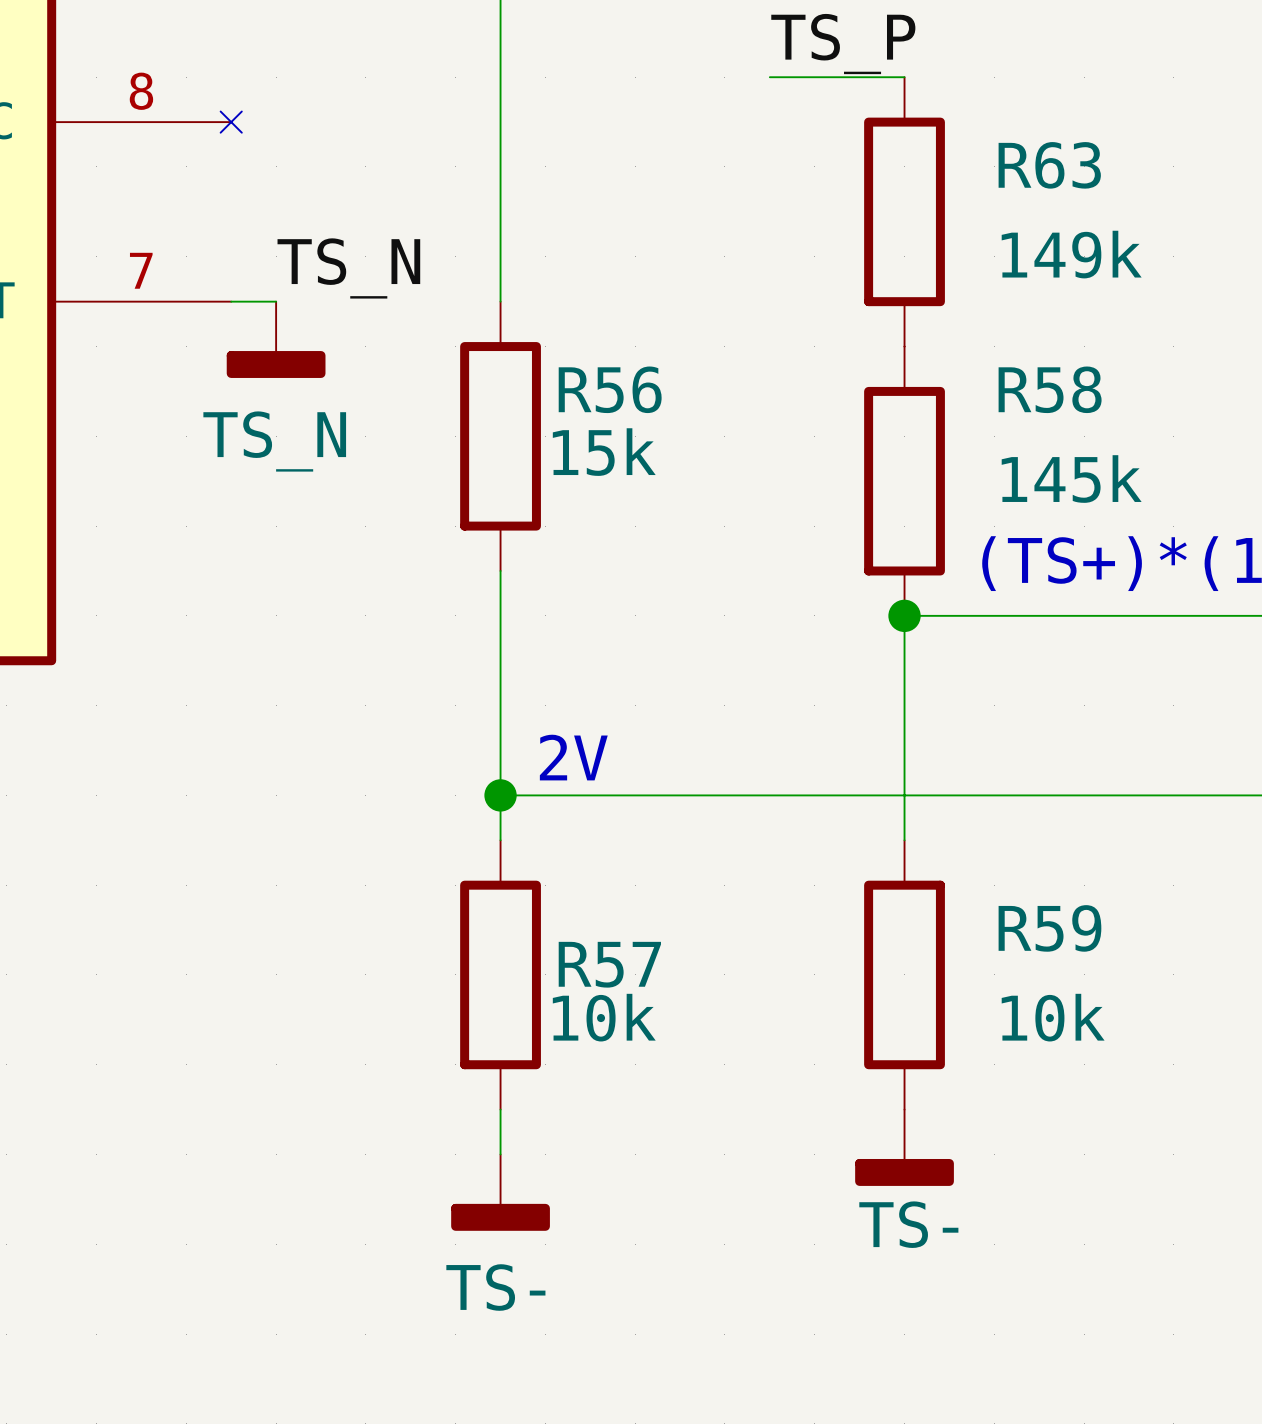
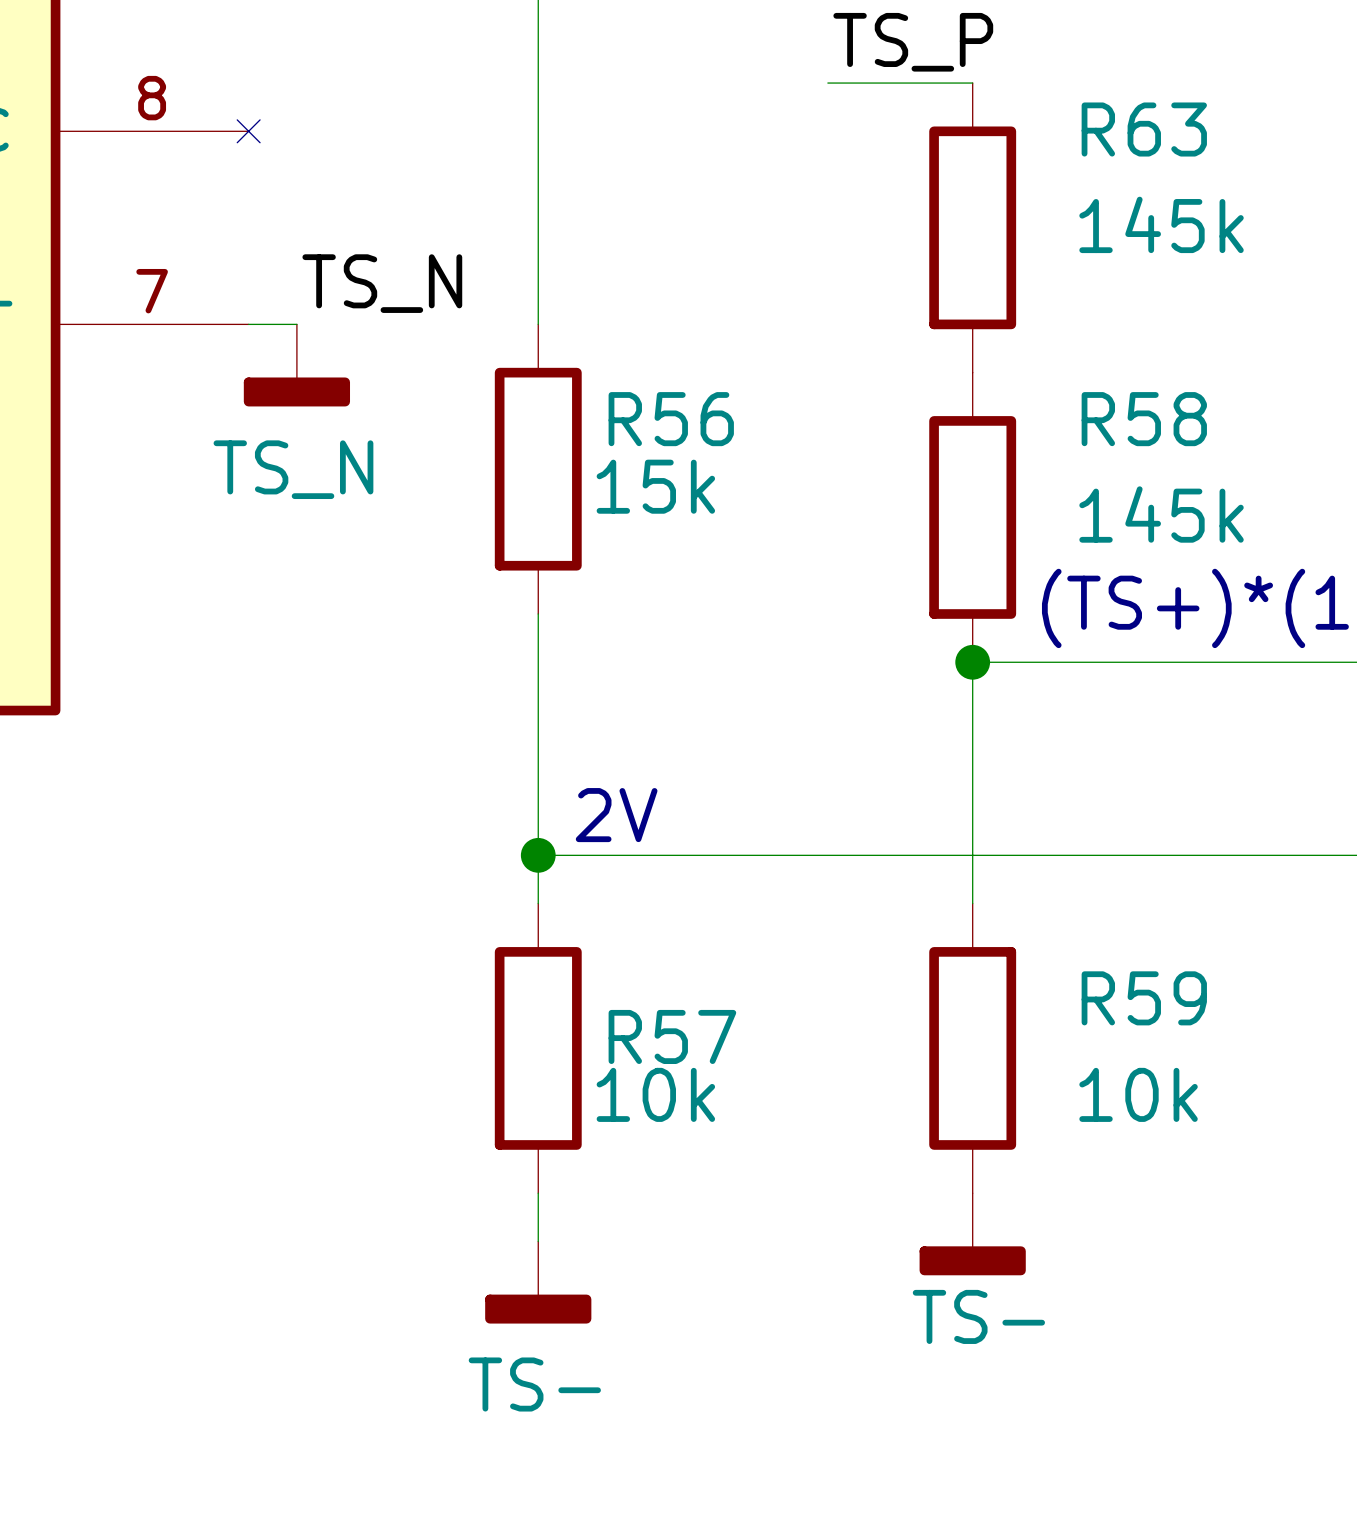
R63 name position: R63 (1049, 165) -> R63 (1144, 129)
R63 value: 149k (1071, 254) -> 145k (1161, 224)

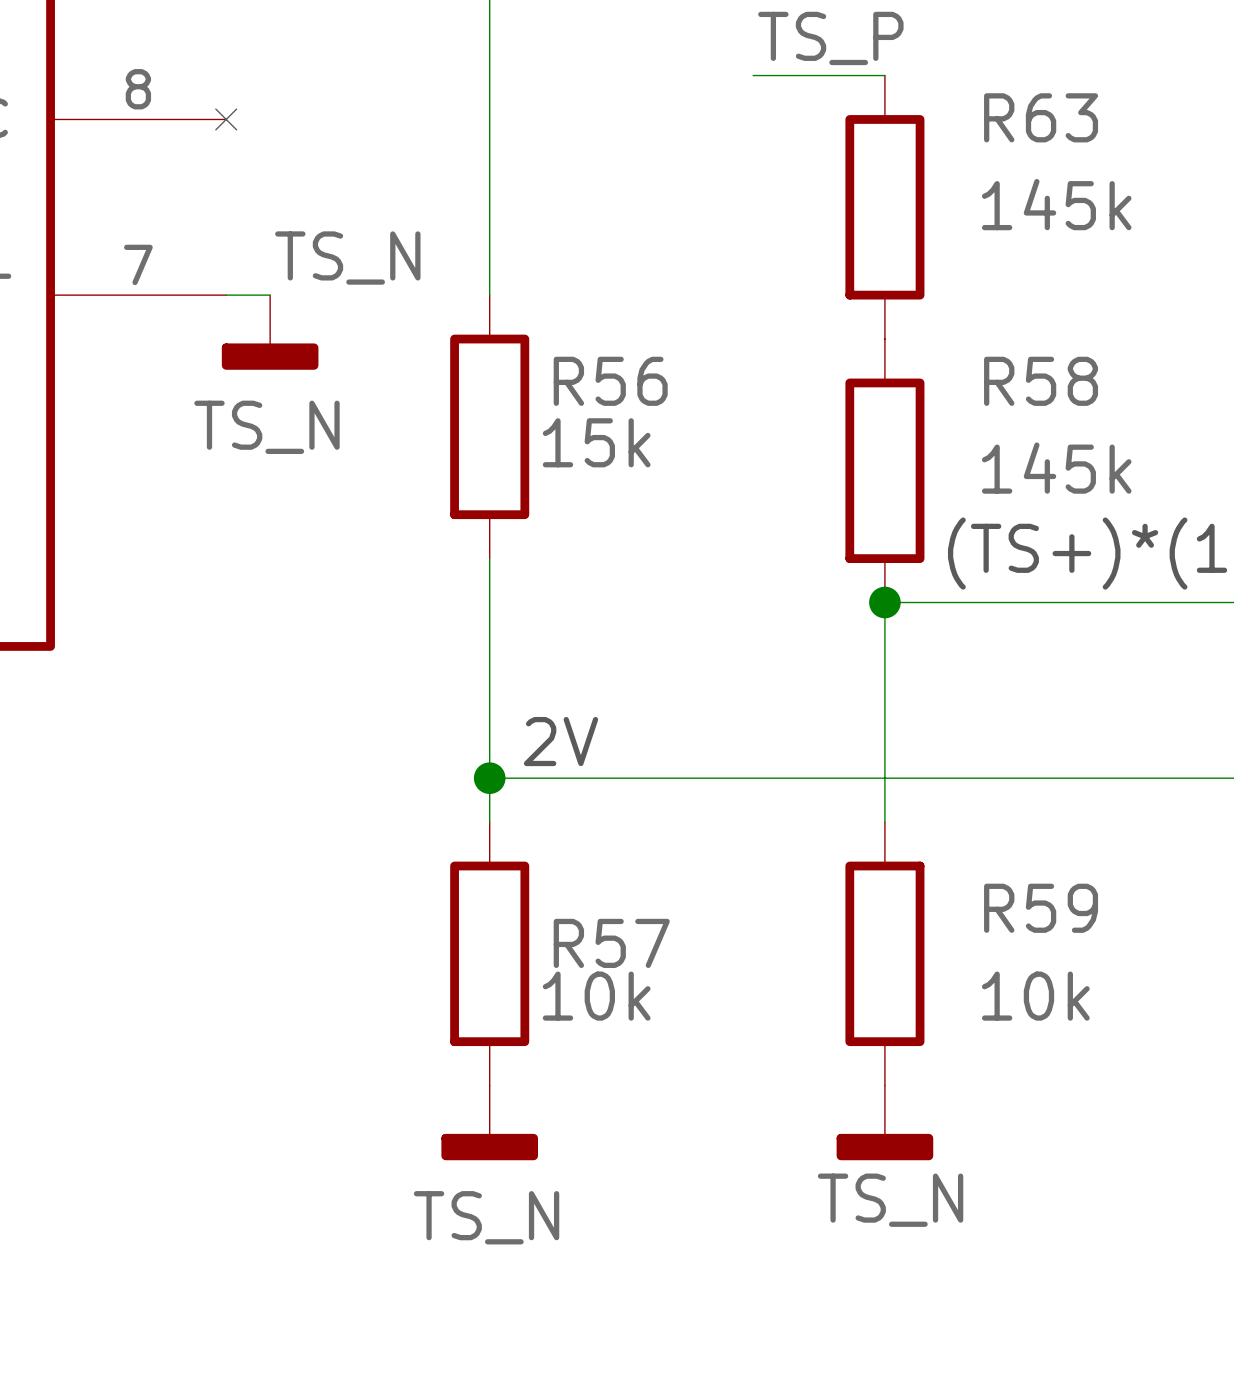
power symbol: none -> TS_N (489, 1122)
power symbol: TS- (972, 1234) -> TS_N (884, 1122)
power symbol: TS- (538, 1282) -> none

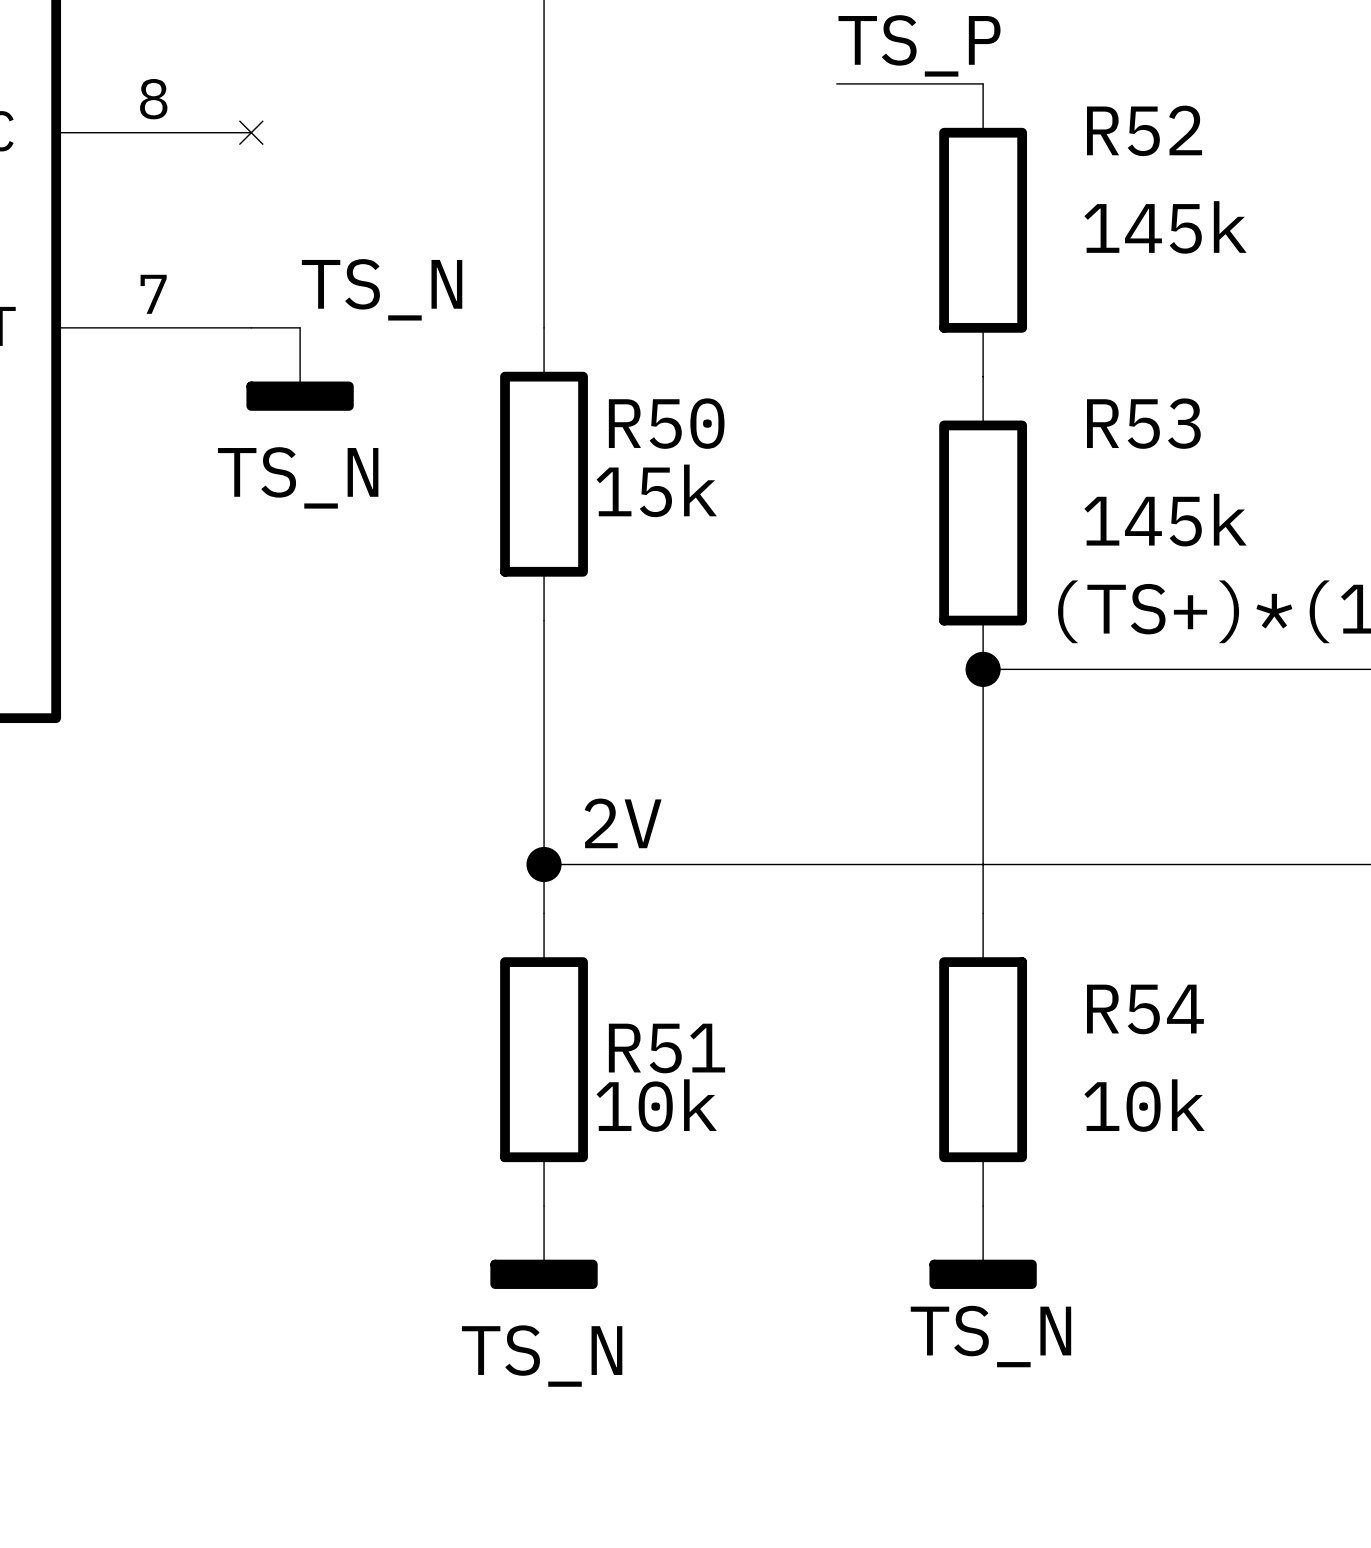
R63 name: R63 (1041, 117) -> R52 (1144, 130)
R56 name: R56 (610, 381) -> R50 (666, 423)
R58 name: R58 (1041, 381) -> R53 (1143, 423)
R59 name: R59 (1041, 908) -> R54 (1145, 1009)
R57 name: R57 (611, 943) -> R51 (666, 1048)

